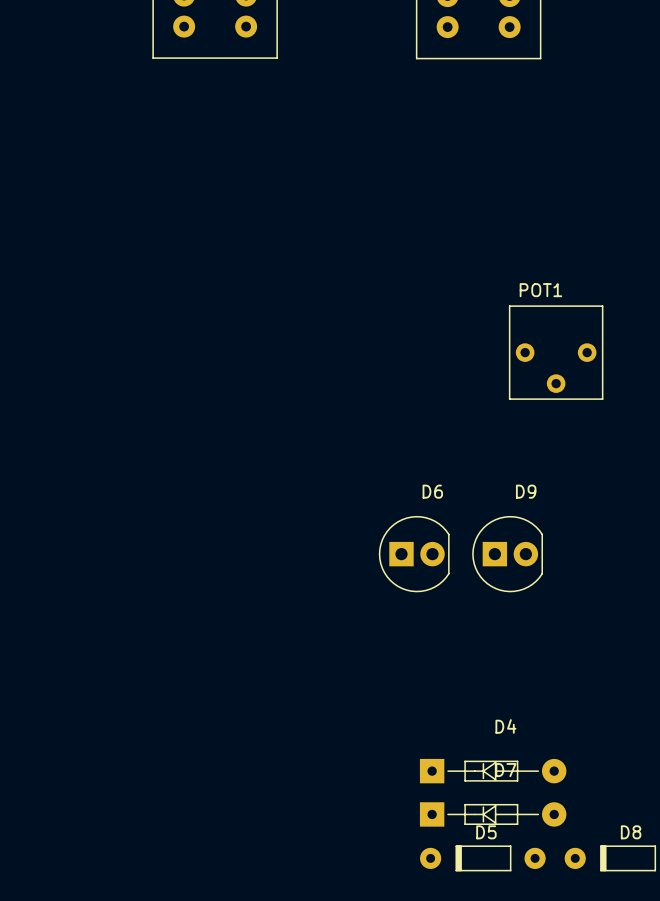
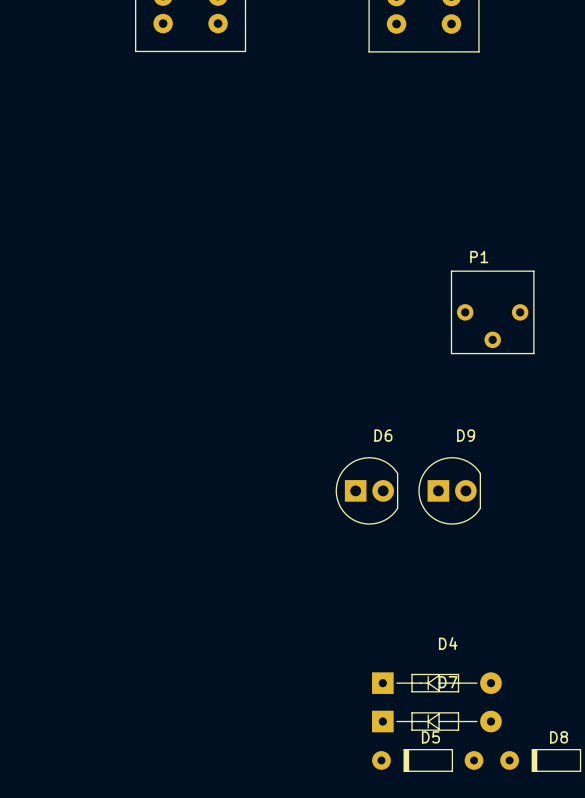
POT1 name: POT1 (540, 290) -> P1 (479, 257)

